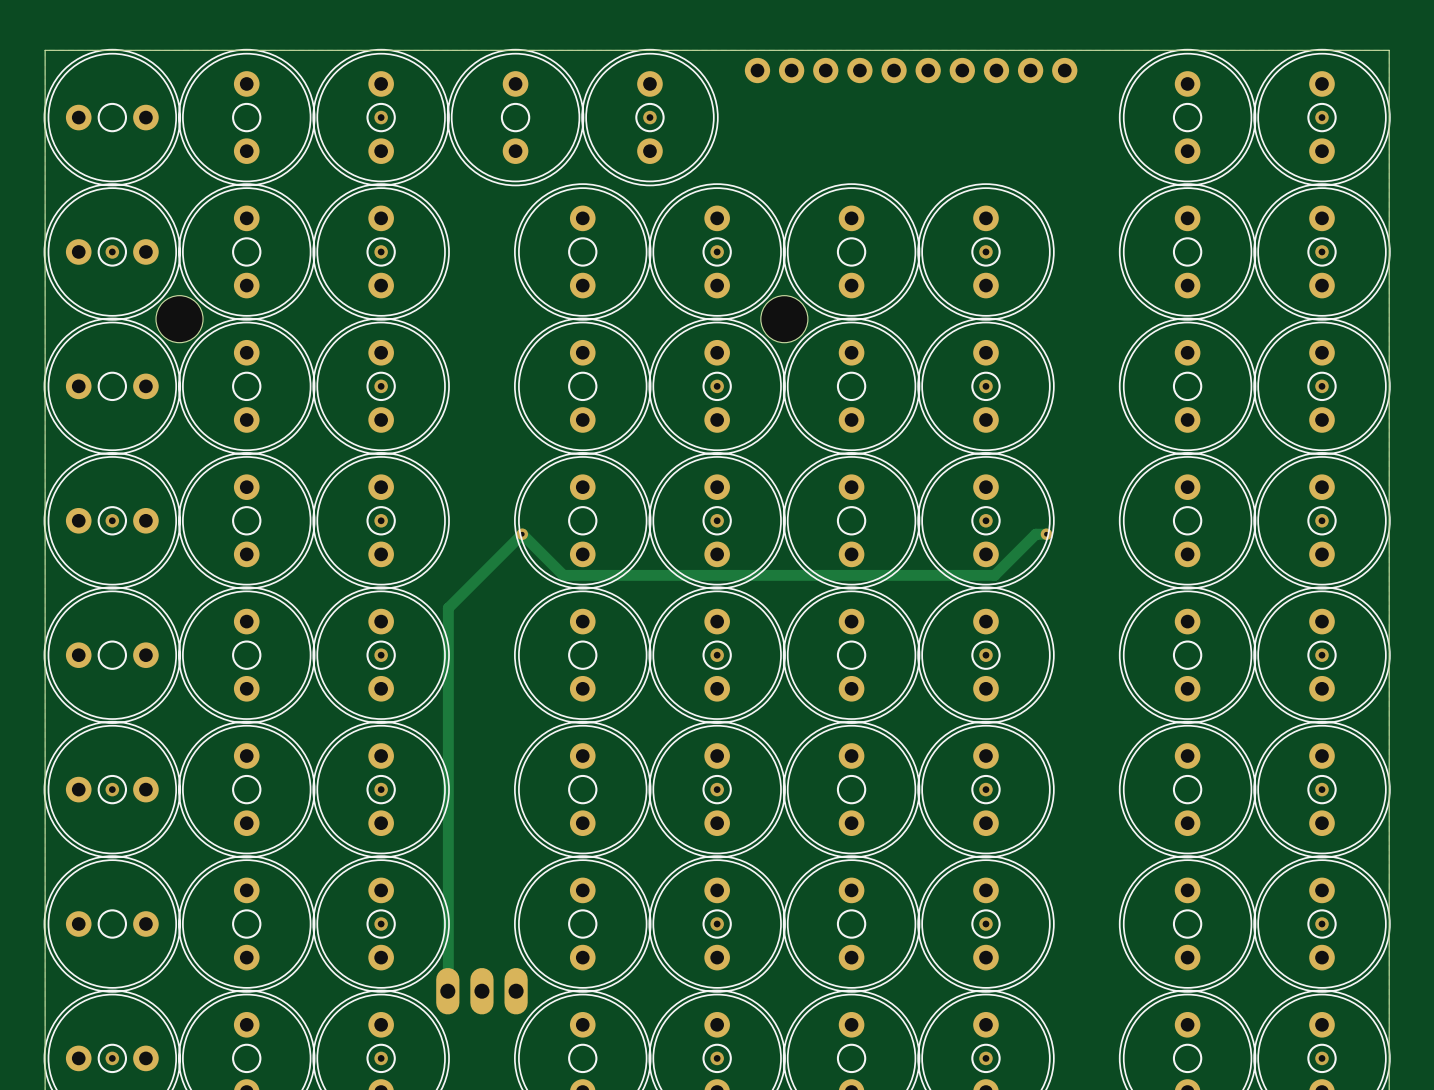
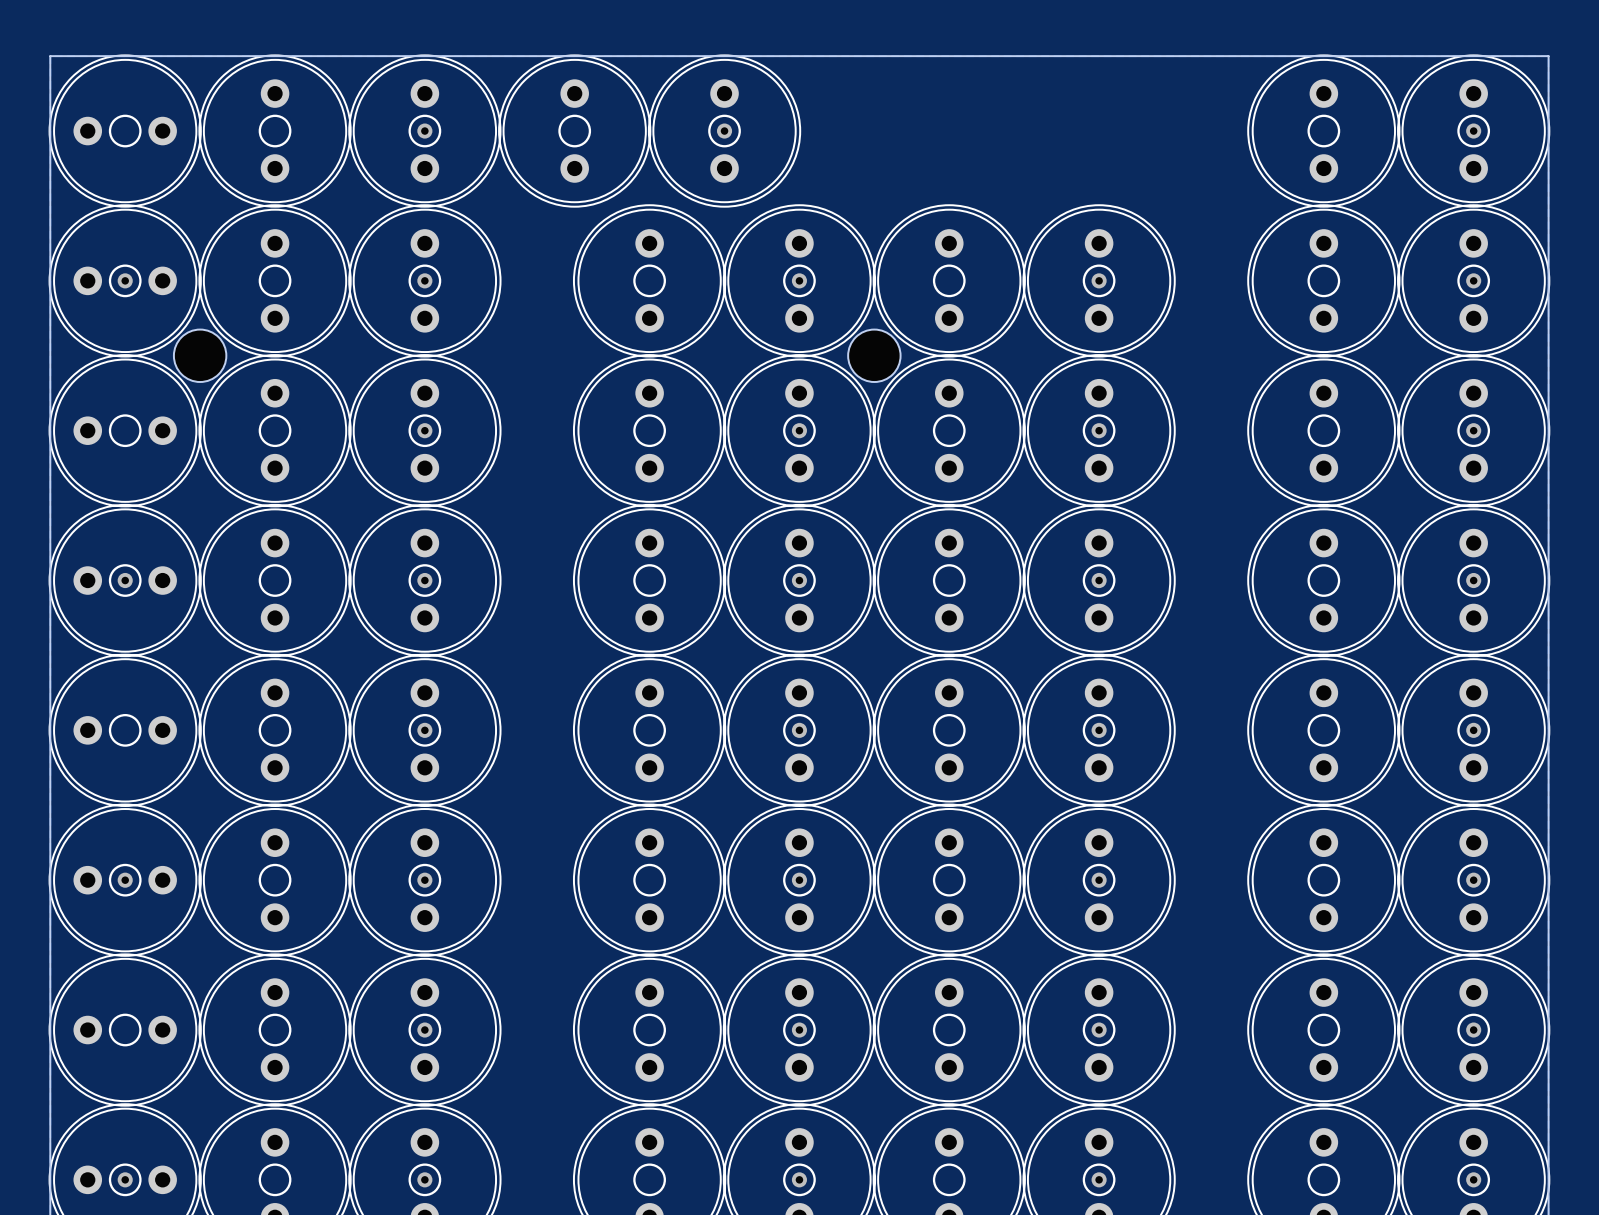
part: (911, 70) -> none
via: (522, 534) -> none
track: (1046, 534) (1035, 534) (994, 575) (563, 575) (522, 534) (448, 608) (448, 991) -> none
via: (1046, 534) -> none
part: (481, 991) -> none

